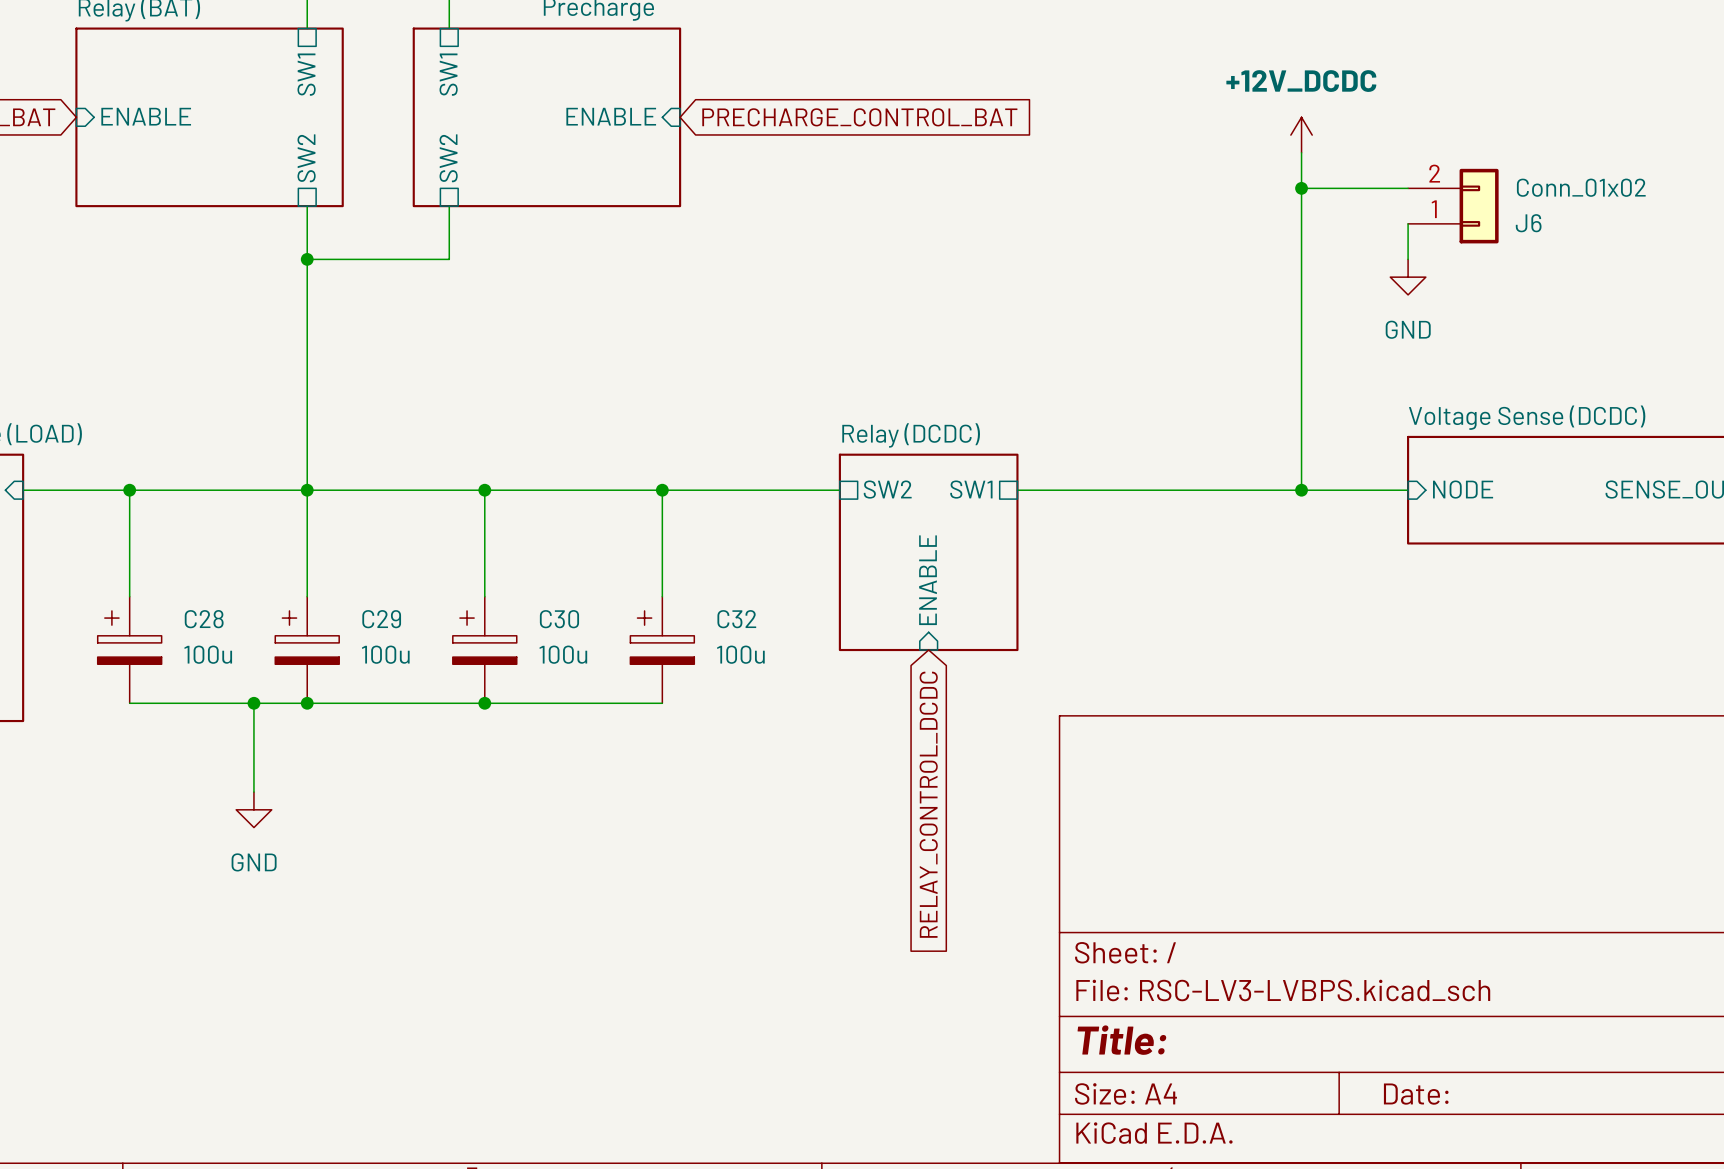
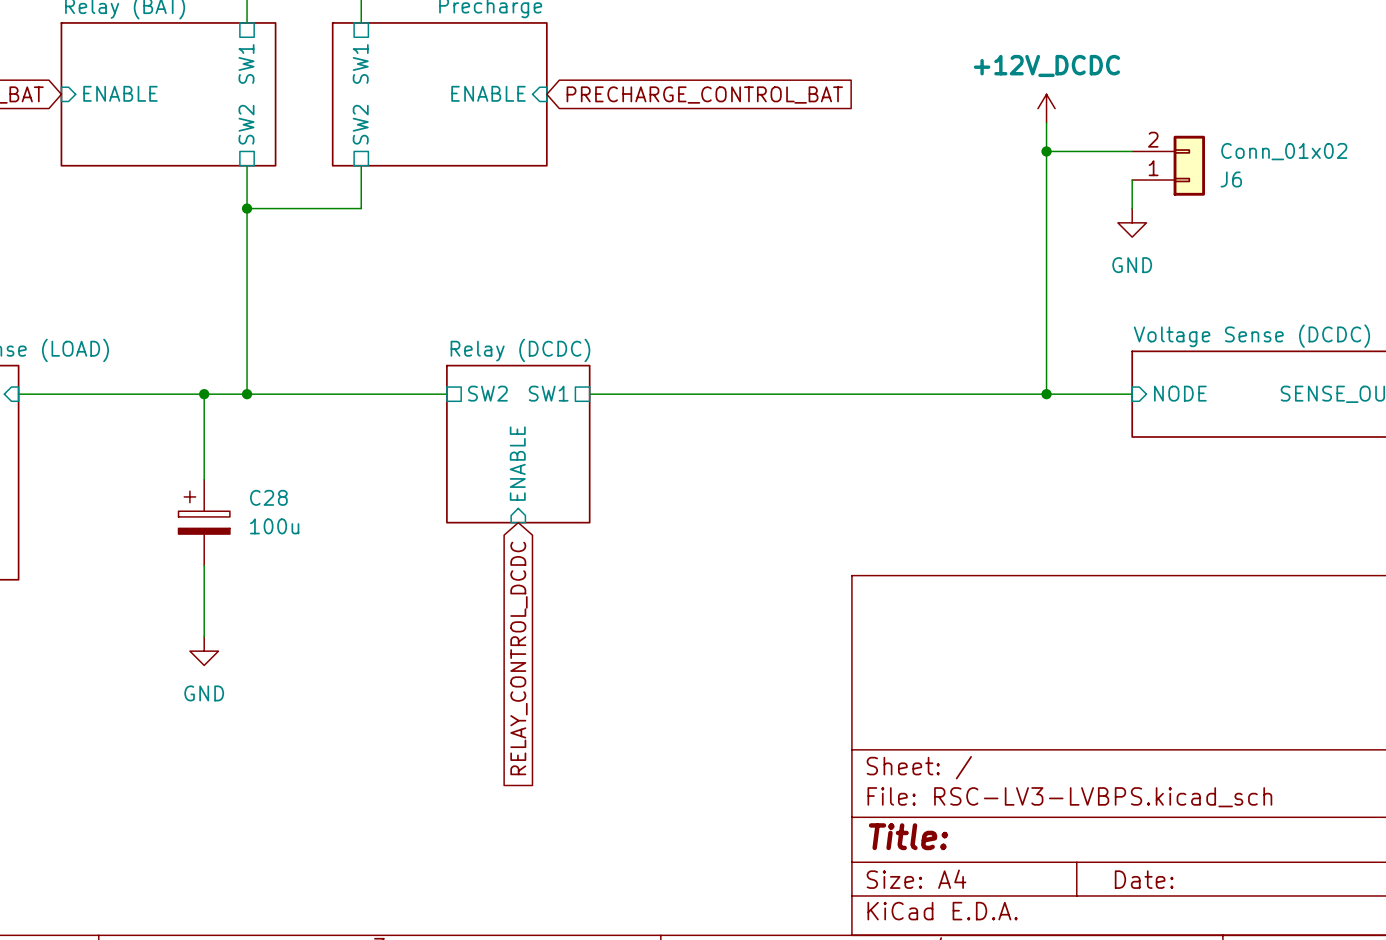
sheet pin position: SW2 (887, 489) -> SW2 (487, 393)
sheet pin position: SW1 (971, 489) -> SW1 (548, 393)
wire: (129, 490) (129, 596) -> none
junction: (129, 490) -> none
junction: none -> (204, 394)
wire: (307, 490) (307, 596) -> (204, 394) (204, 479)
wire: (484, 490) (484, 596) -> none
junction: (484, 490) -> none
wire: (555, 490) (733, 490) -> (675, 394) (818, 394)
wire: (662, 490) (662, 596) -> none
junction: (662, 490) -> none
sheet Relay (DCDC) position: (928, 552) -> (518, 444)
sheet pin position: ENABLE (928, 580) -> ENABLE (517, 463)
C28 position: (129, 650) -> (204, 522)
C29: 100u (307, 650) -> none
C30: 100u (484, 650) -> none
C32: 100u (662, 650) -> none
wire: (129, 703) (662, 703) -> none
junction: (253, 703) -> none
junction: (307, 703) -> none
junction: (484, 703) -> none
global label position: RELAY_CONTROL_DCDC (928, 804) -> RELAY_CONTROL_DCDC (518, 658)

